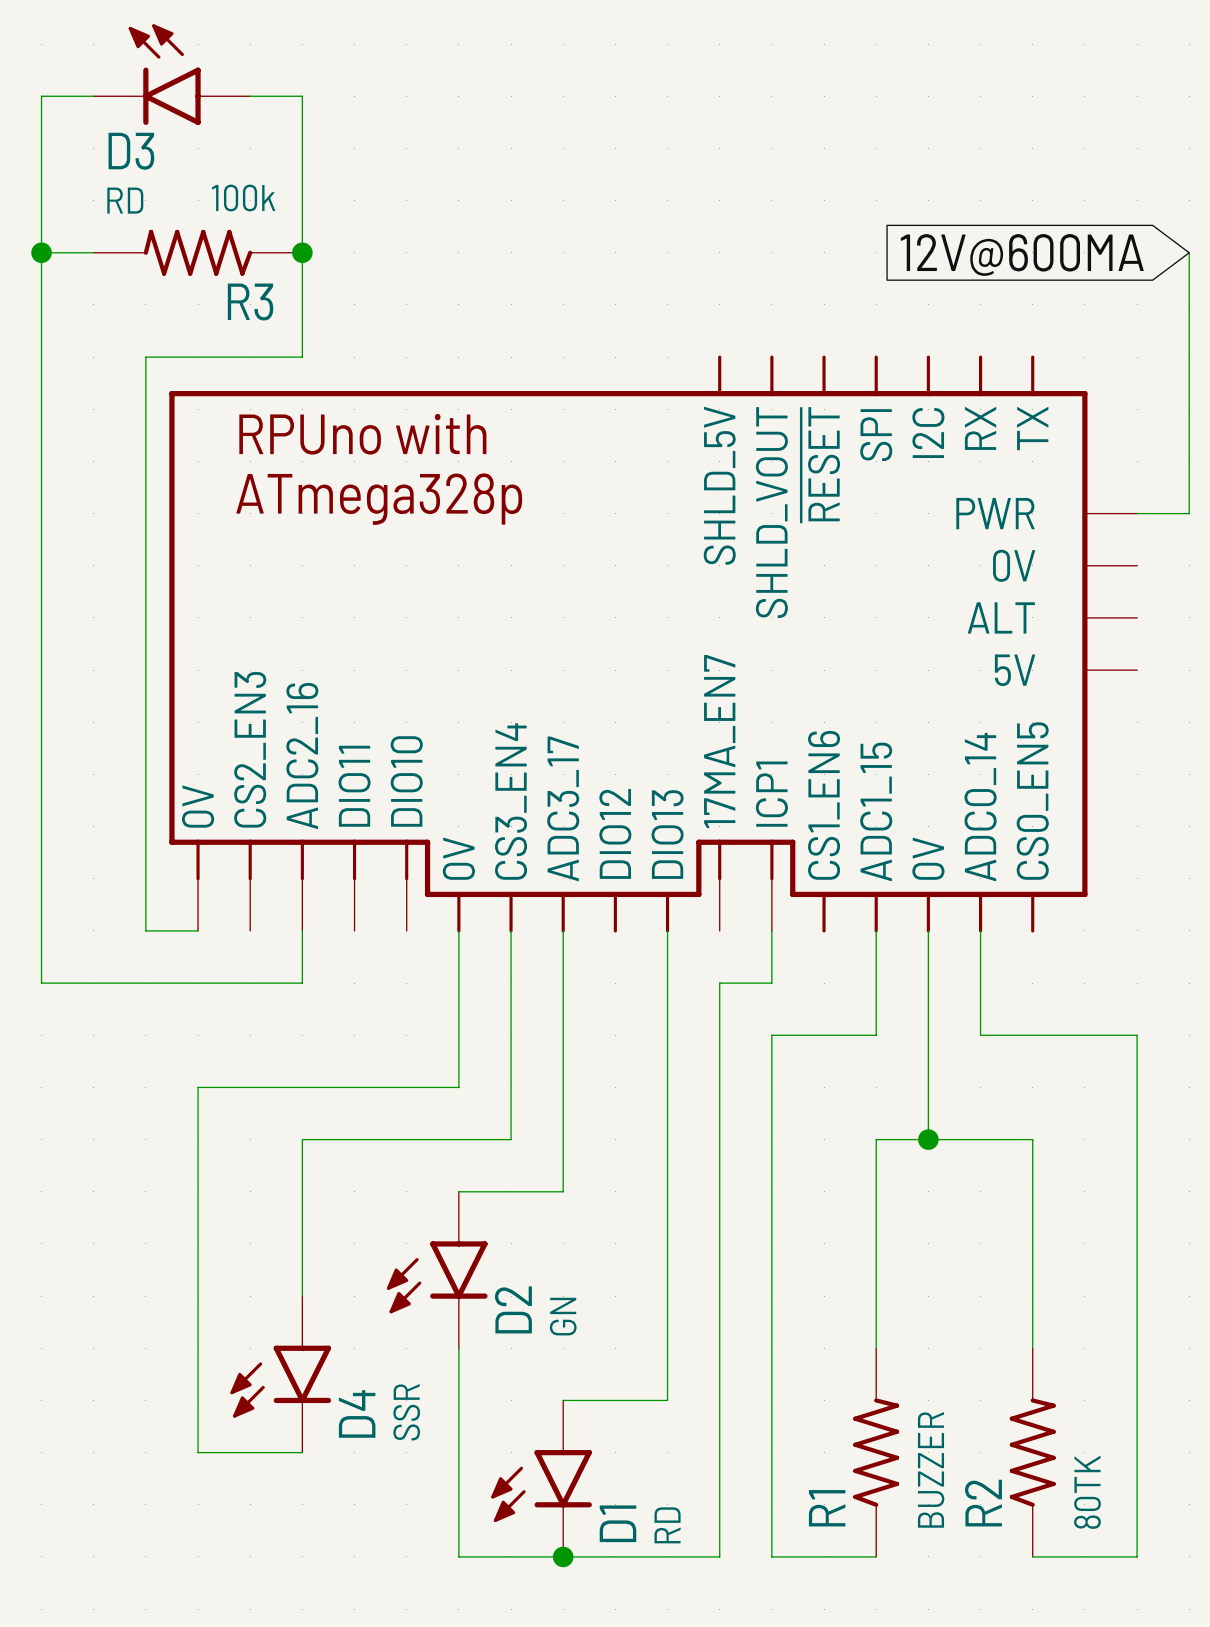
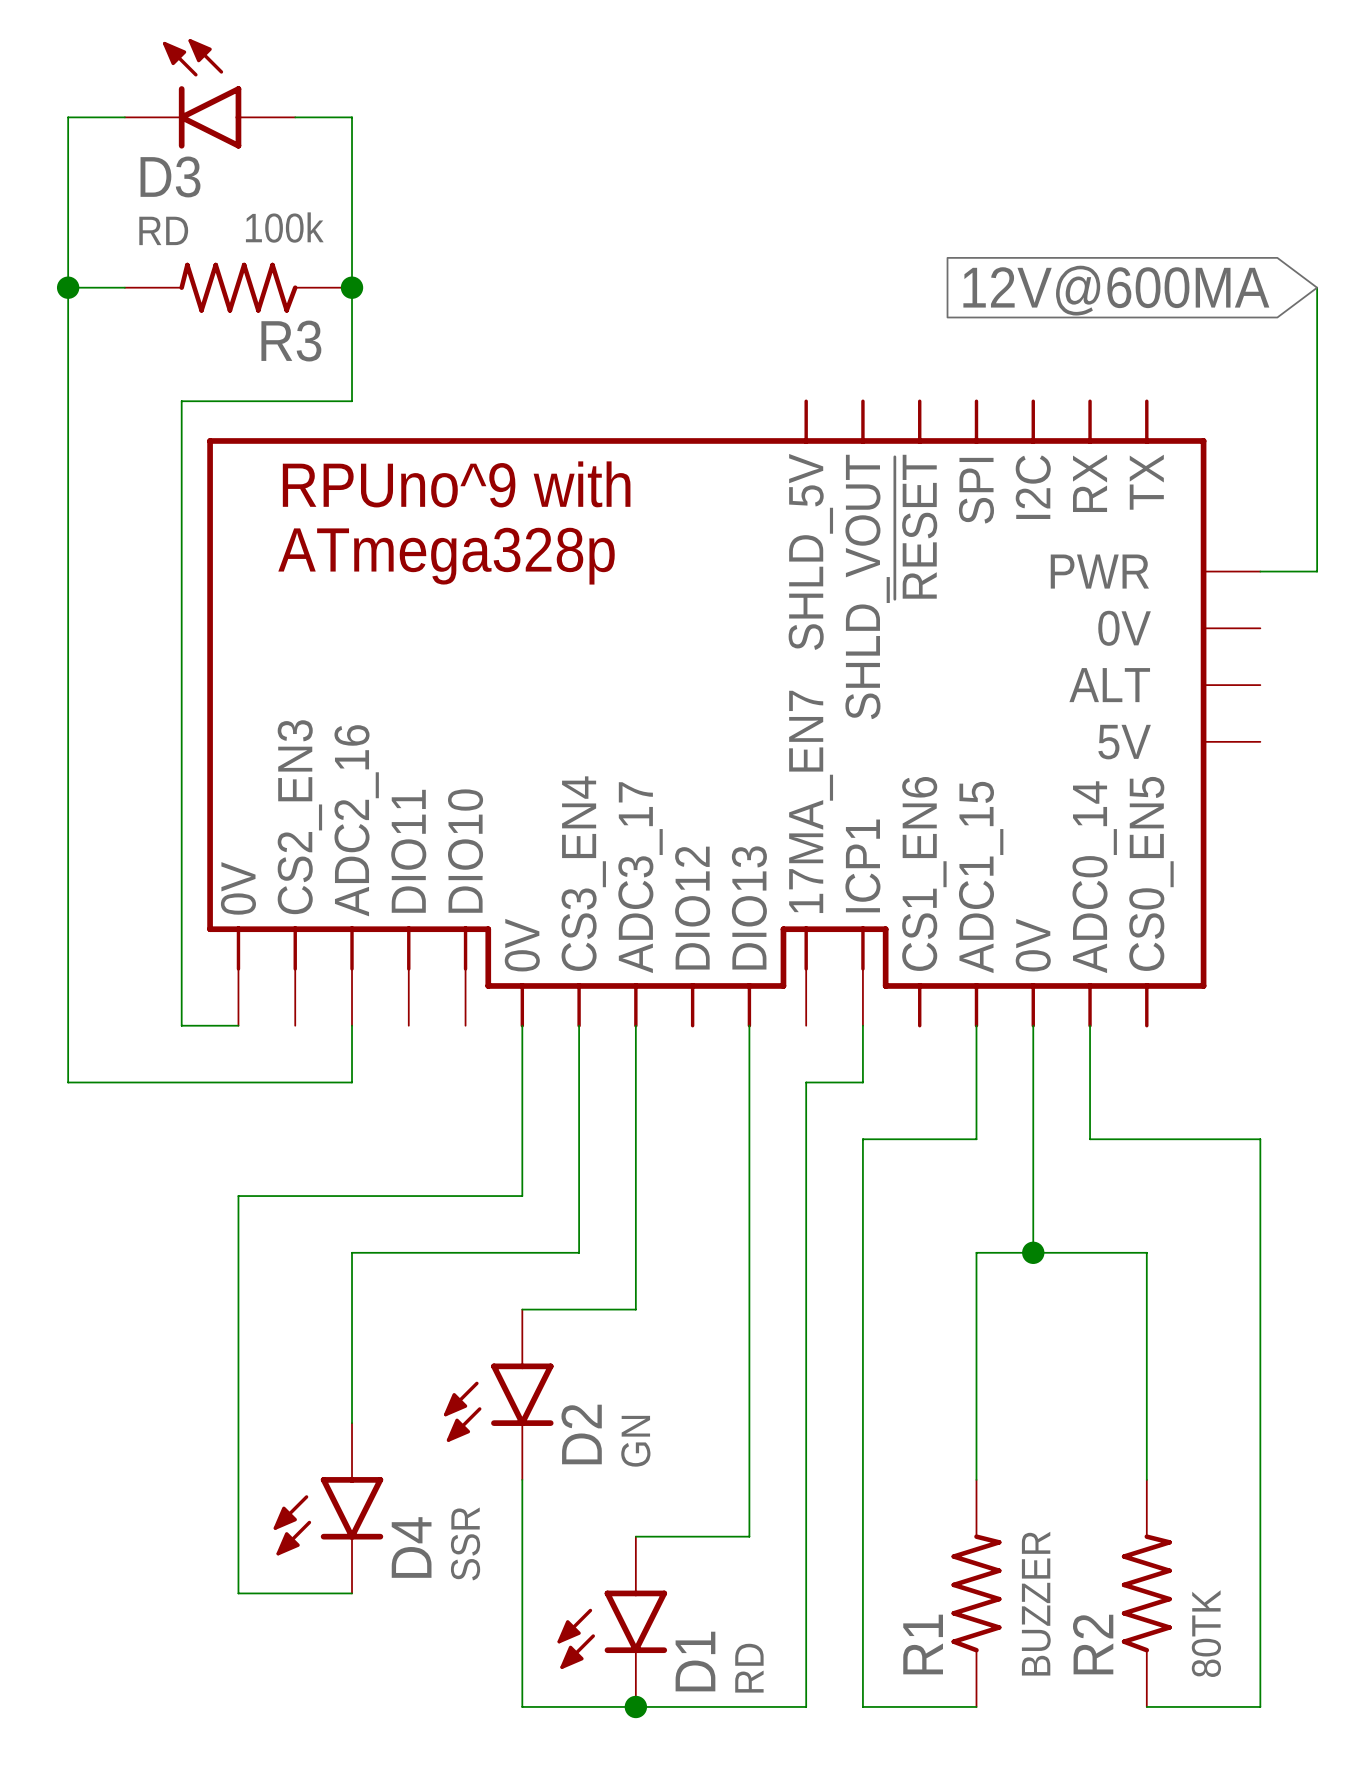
part text: RPUno with (362, 434) -> RPUno^9 with (456, 484)

